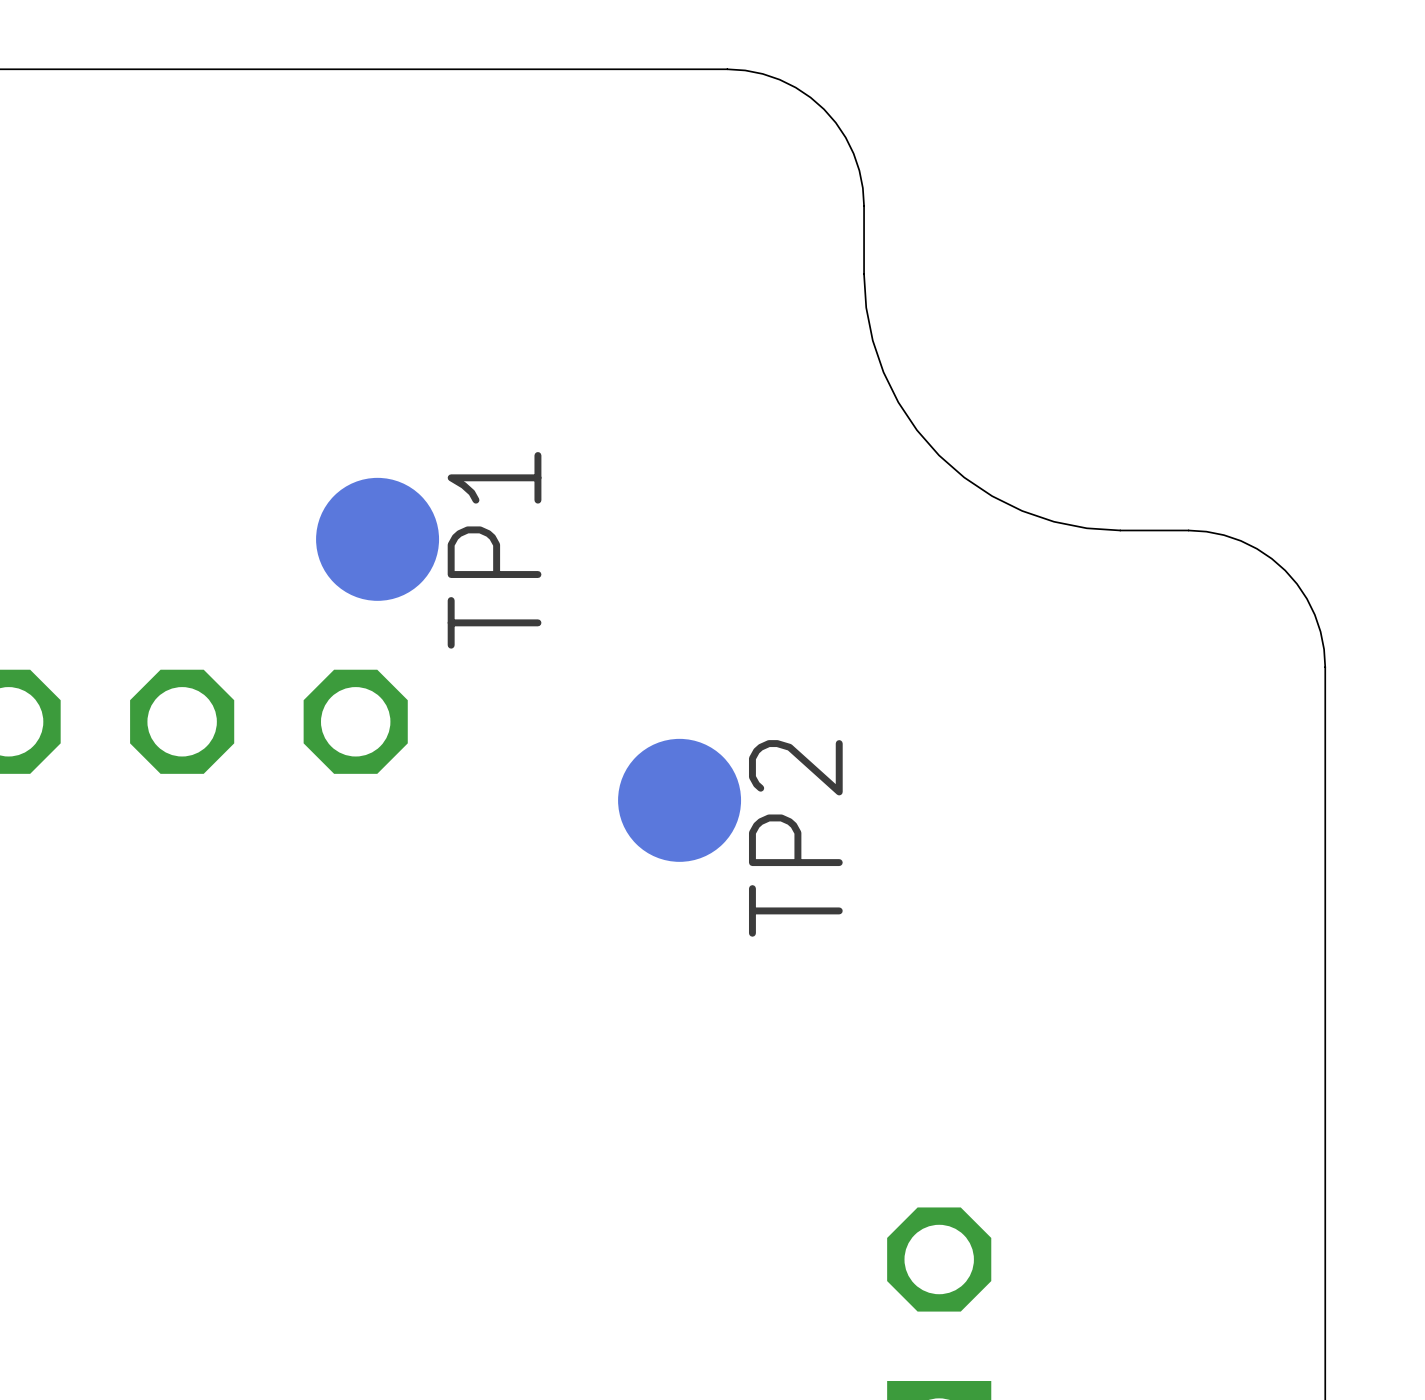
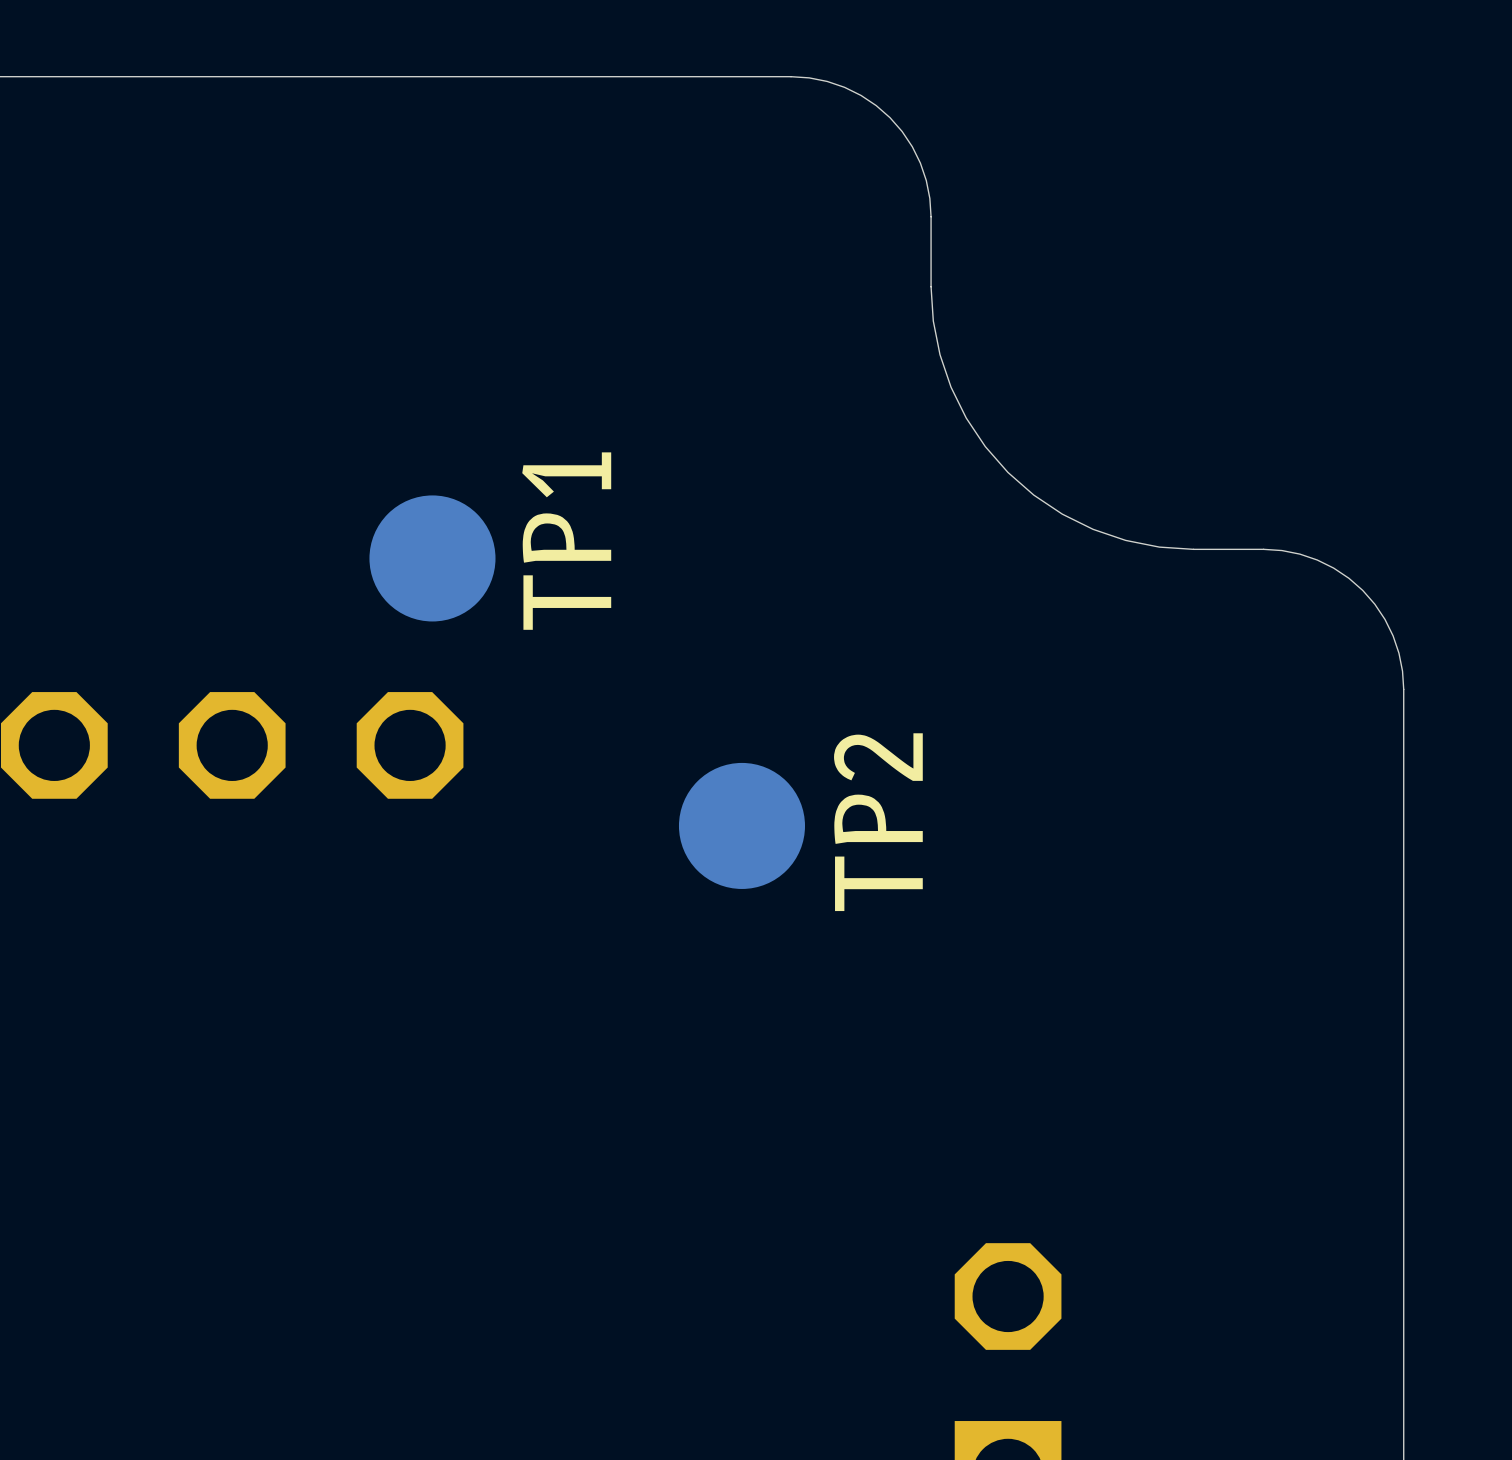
TP1 name position: TP1 (494, 550) -> TP1 (566, 541)
TP2 name position: TP2 (795, 838) -> TP2 (878, 822)

